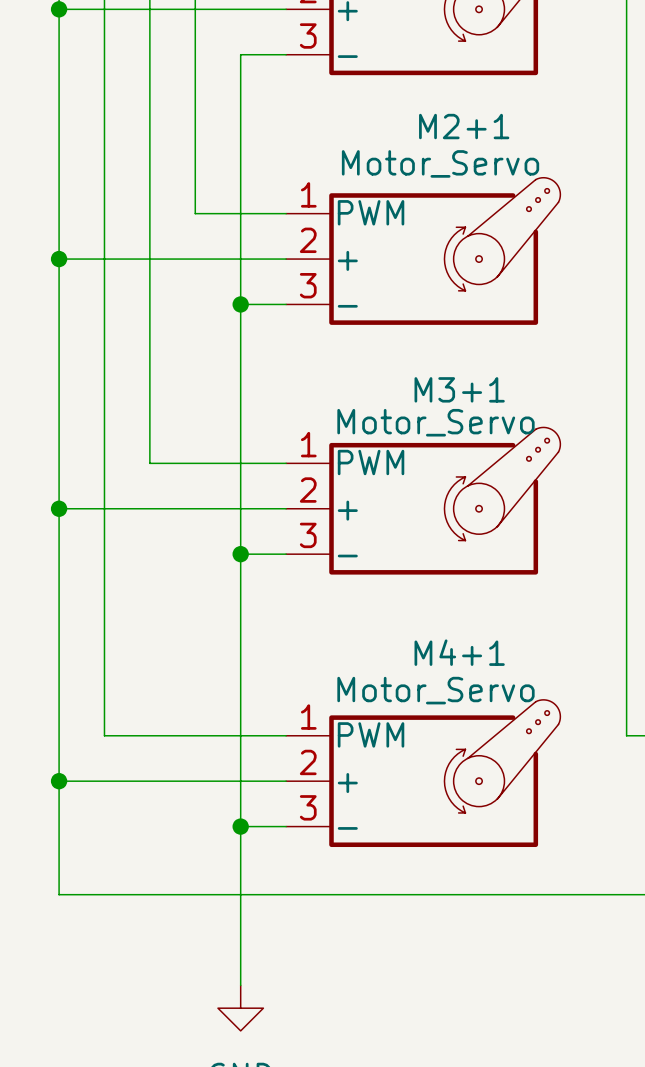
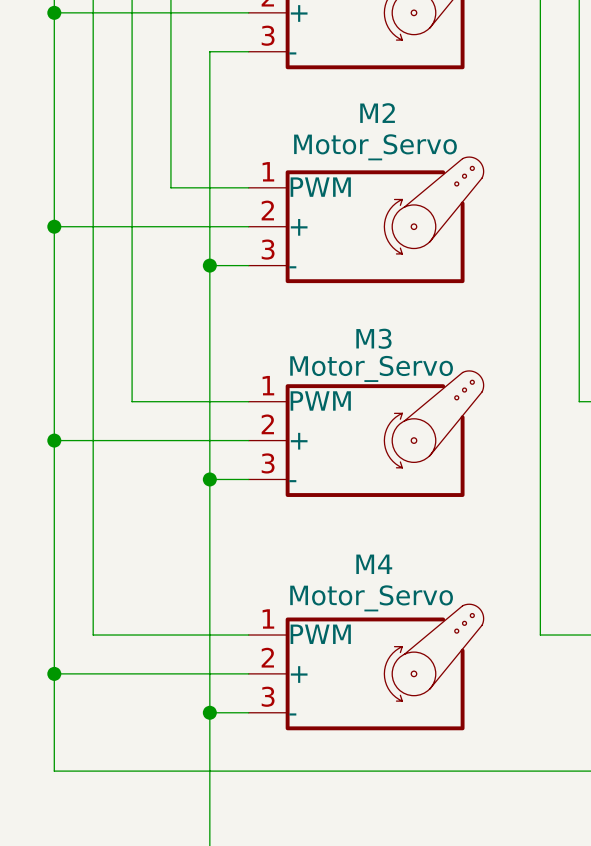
M2+1 name: M2+1 (464, 126) -> M2 (377, 113)
M3+1 name: M3+1 (459, 389) -> M3 (373, 338)
M4+1 name: M4+1 (459, 652) -> M4 (374, 564)

